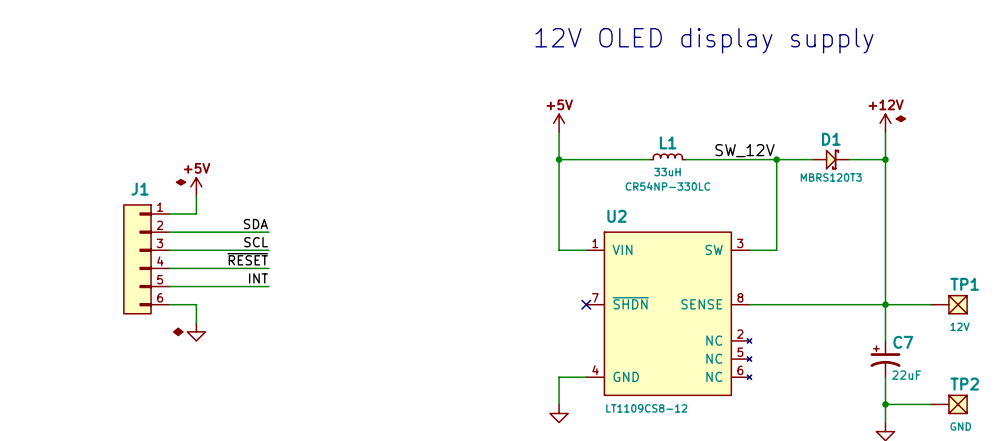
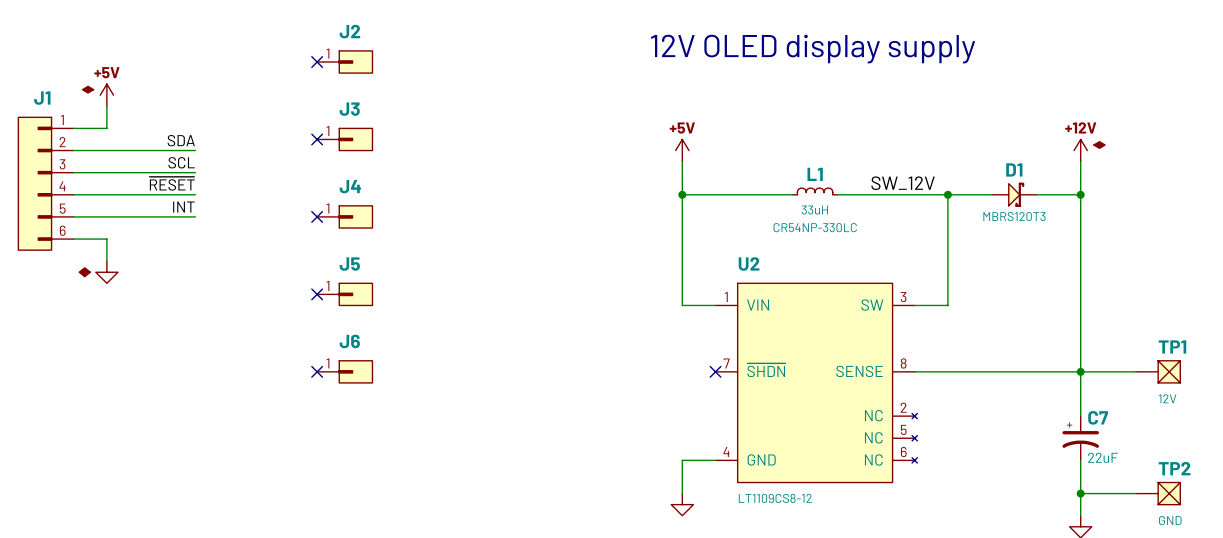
no-connect mark: none -> (317, 62)
J2: none -> (344, 62)
no-connect mark: none -> (317, 139)
J3: none -> (344, 139)
no-connect mark: none -> (317, 216)
J4: none -> (344, 216)
power symbol position: (189, 186) -> (98, 95)
wire: (196, 195) (196, 214) (169, 214) -> (106, 106) (106, 128) (73, 128)
label position: SDA (255, 224) -> SDA (181, 140)
wire: (169, 232) (268, 232) -> (73, 150) (195, 150)
no-connect mark: none -> (317, 294)
J5: none -> (344, 294)
label position: SCL (256, 242) -> SCL (181, 162)
wire: (169, 250) (268, 250) -> (73, 172) (195, 172)
J1 position: (146, 259) -> (46, 183)
label position: ~{RESET} (247, 259) -> ~{RESET} (172, 183)
wire: (169, 268) (268, 268) -> (73, 194) (195, 194)
label position: INT (258, 278) -> INT (183, 207)
wire: (169, 286) (268, 286) -> (73, 216) (195, 216)
wire: (169, 304) (196, 304) (196, 322) -> (73, 239) (106, 239) (106, 261)
no-connect mark: none -> (317, 371)
J6: none -> (344, 371)
power symbol position: (189, 331) -> (98, 272)

